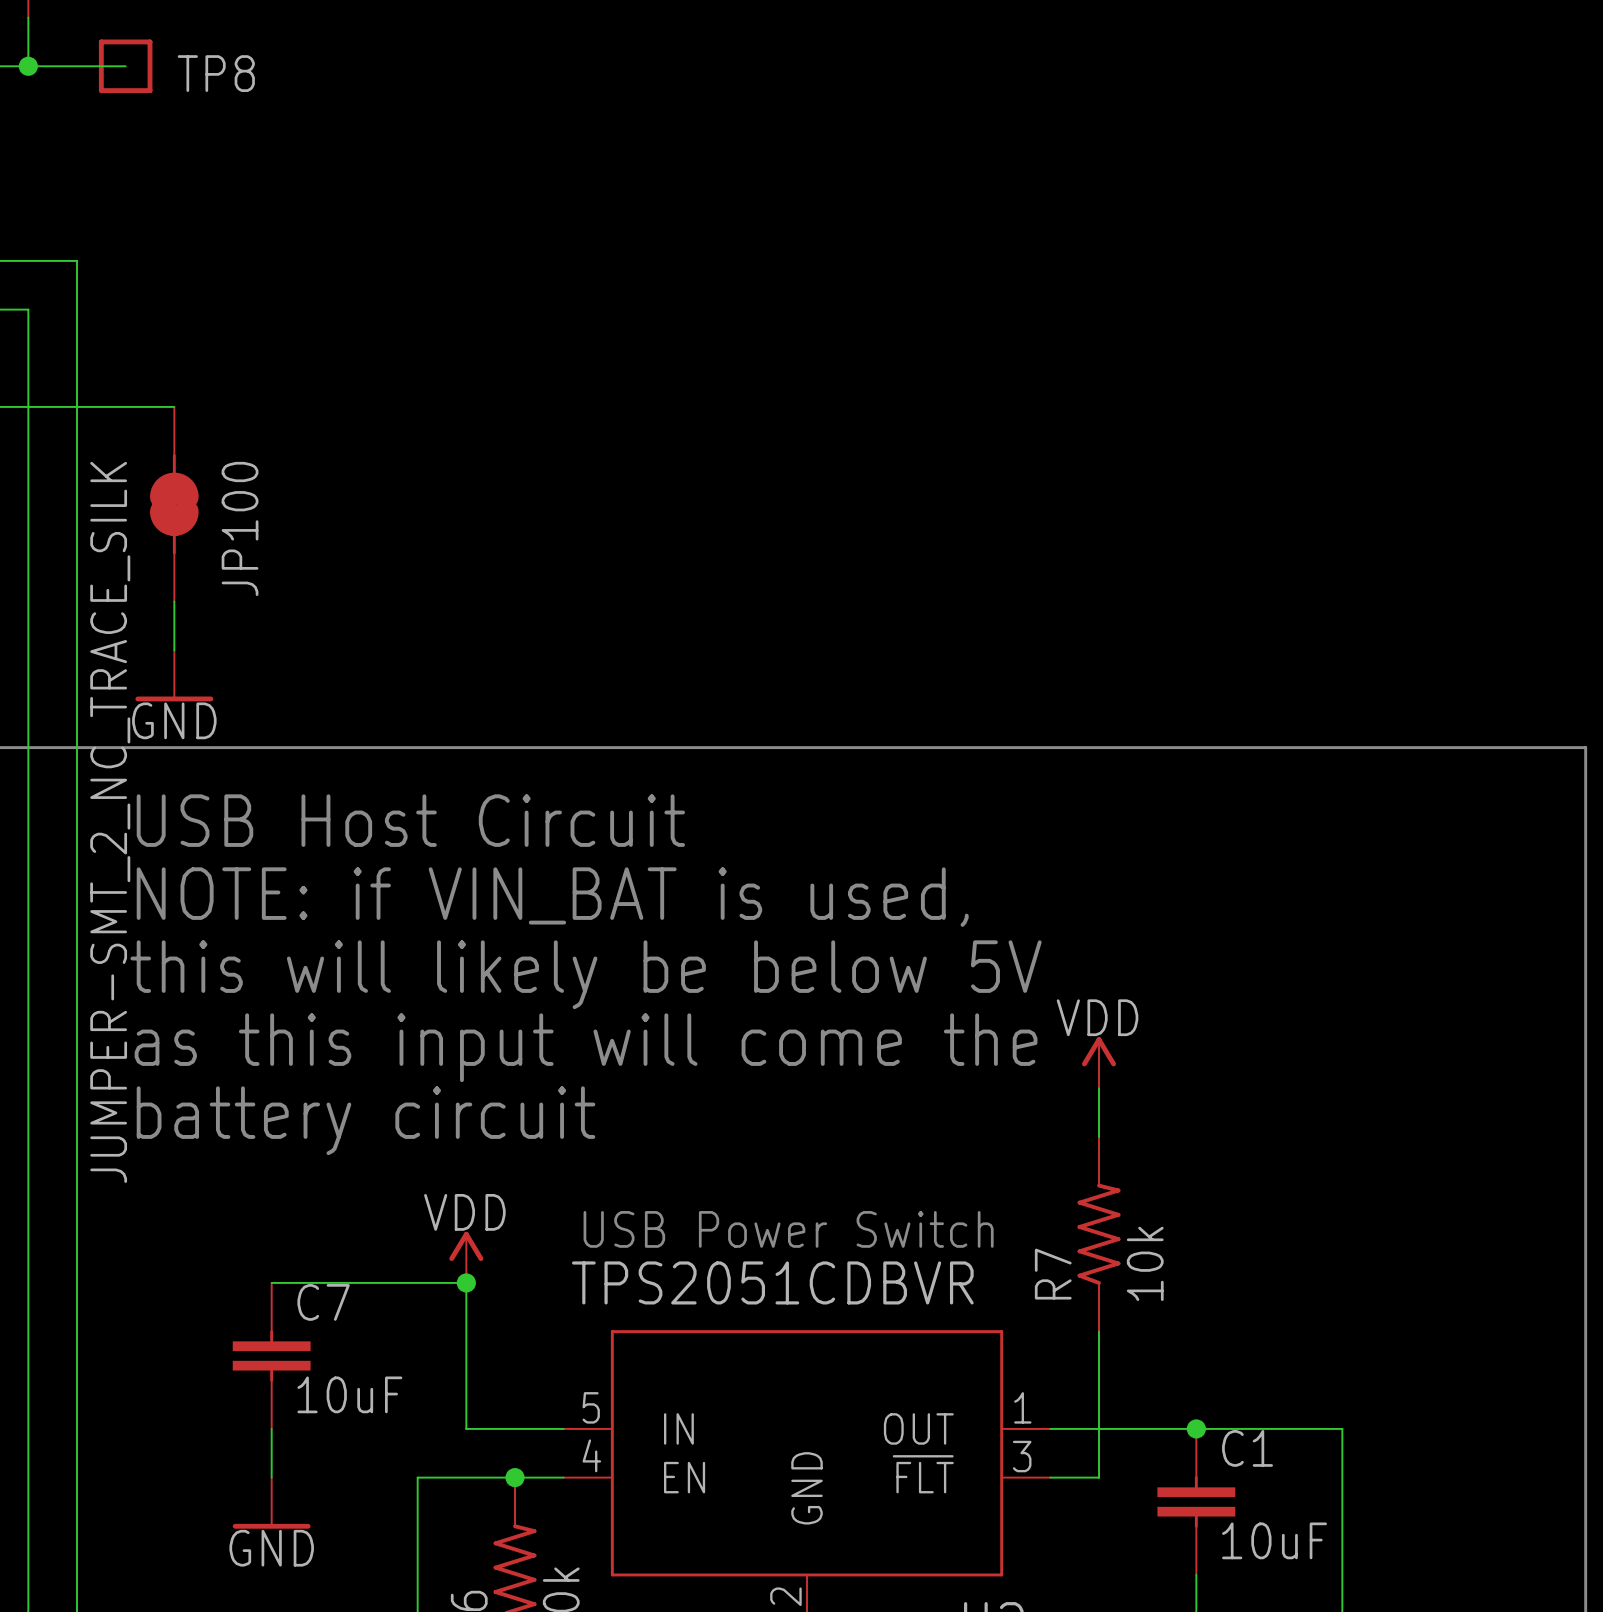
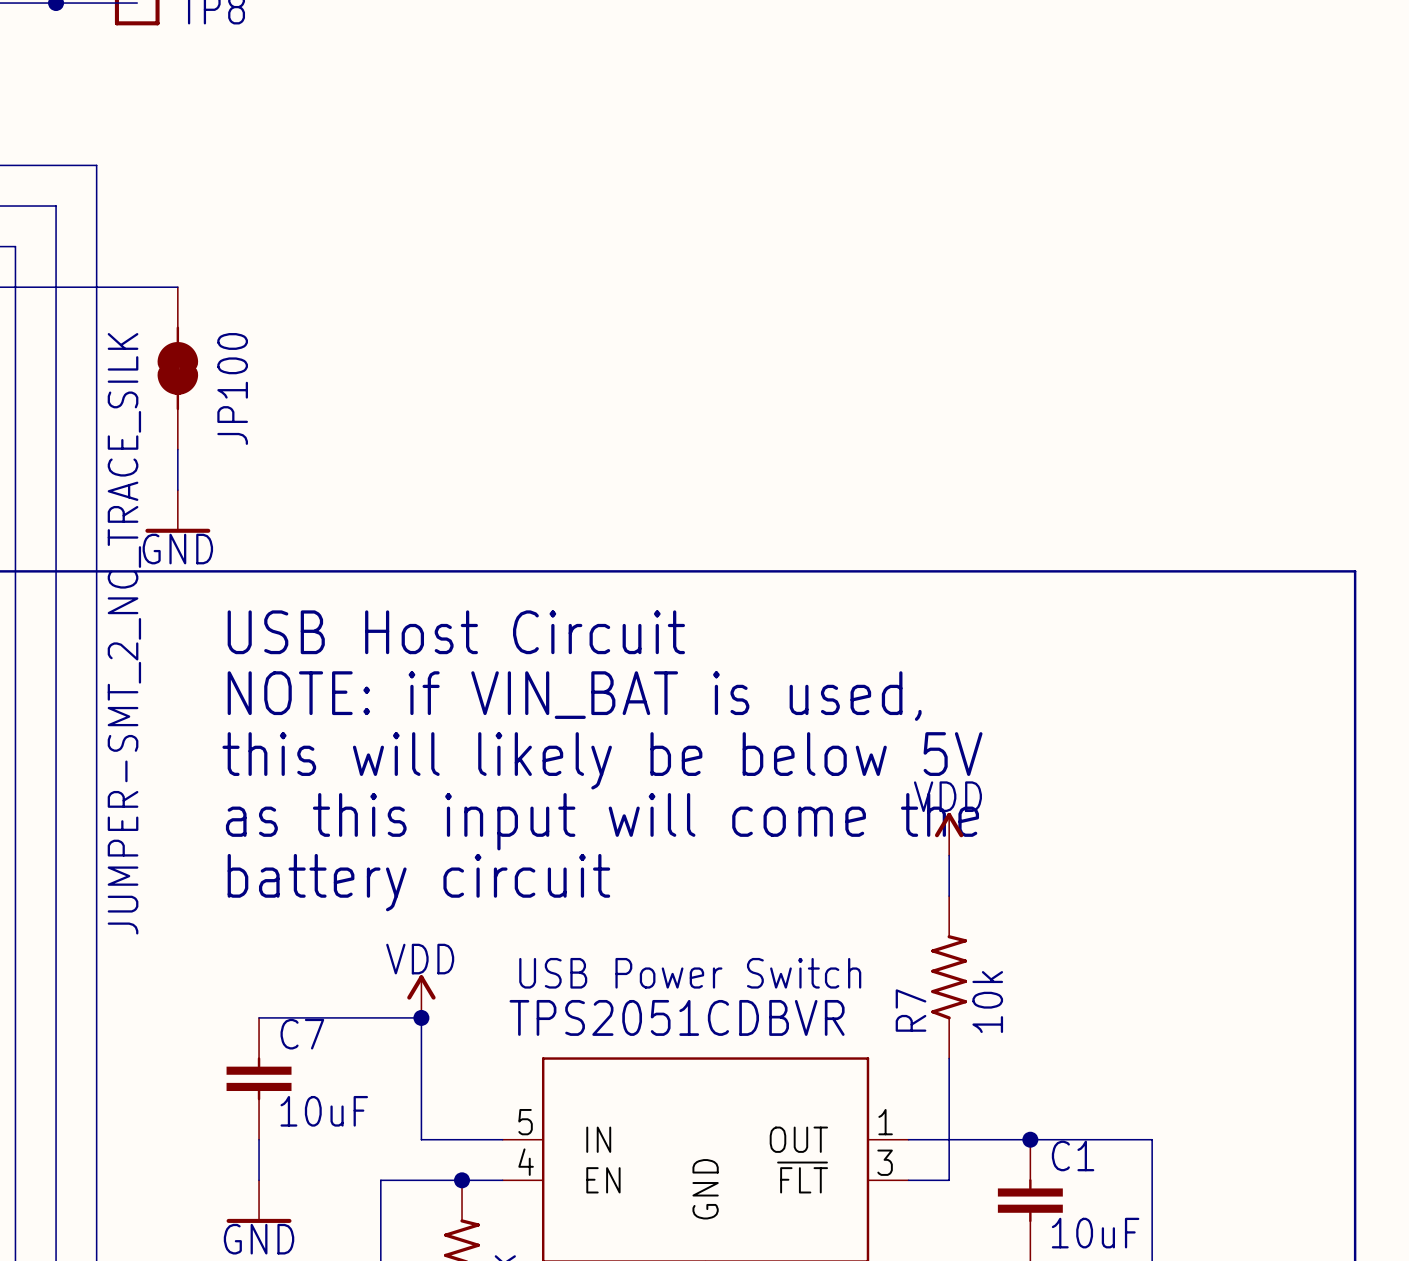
text position: USB Host Circuit (410, 820) -> USB Host Circuit (456, 632)
text position: NOTE: if VIN_BAT is used, (552, 897) -> NOTE: if VIN_BAT is used, (574, 696)
text position: this will likely be below 5V (586, 974) -> this will likely be below 5V (602, 760)
text position: as this input will come the (586, 1047) -> as this input will come the (602, 821)
text position: battery circuit (366, 1120) -> battery circuit (418, 882)

